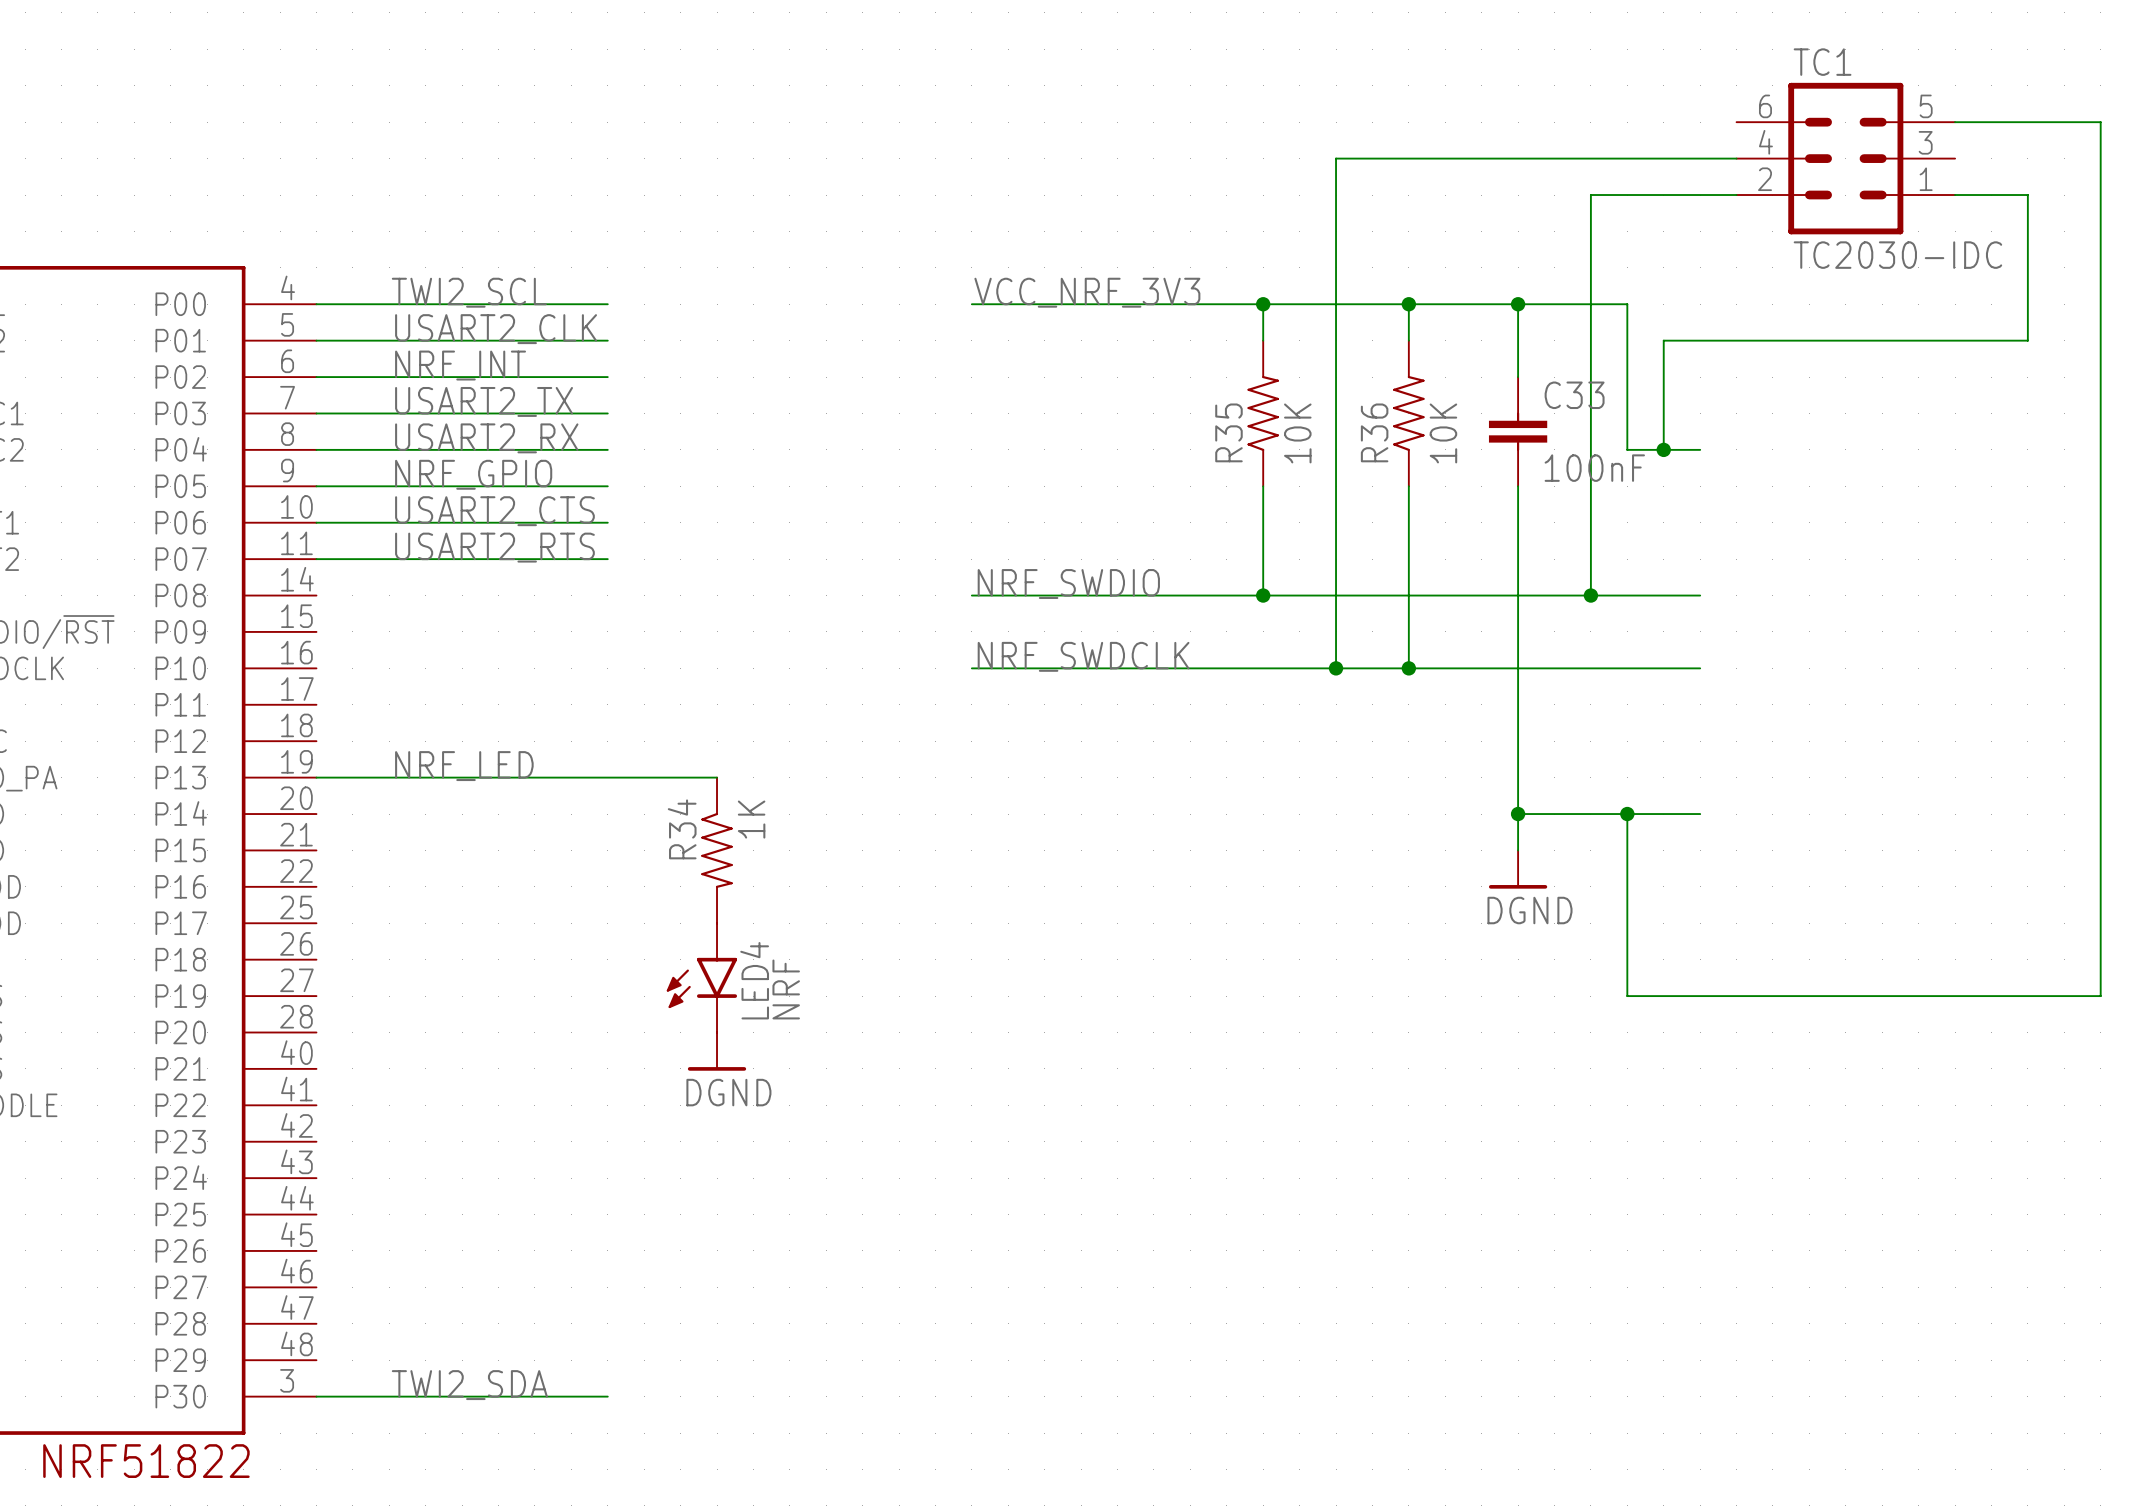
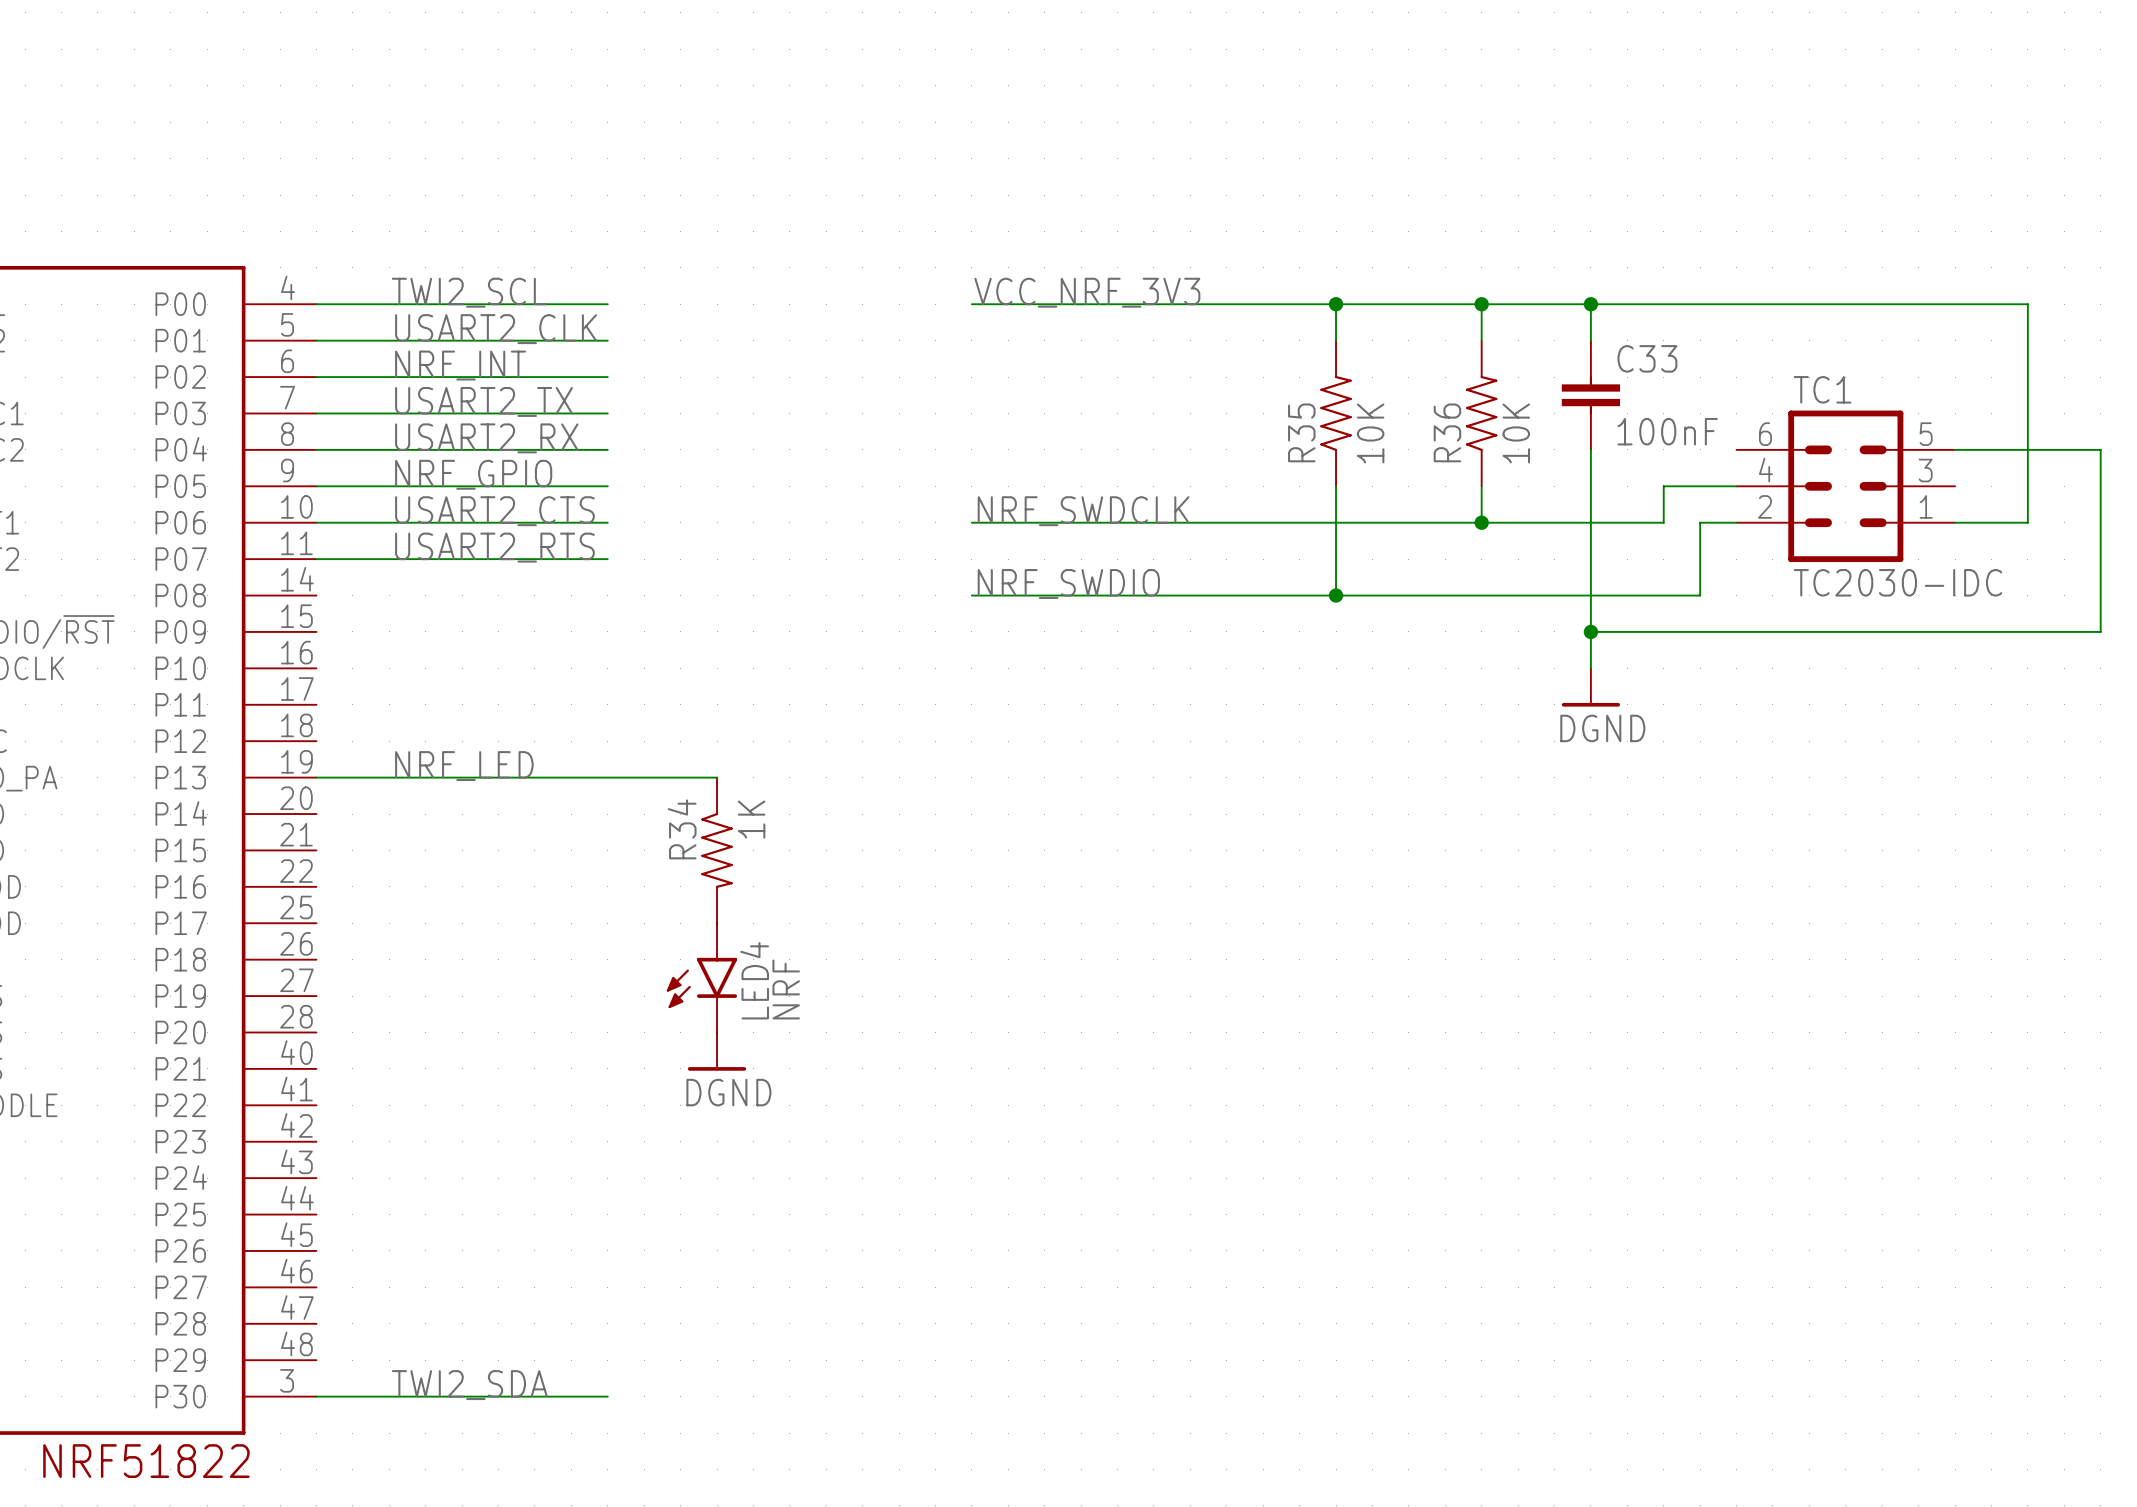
wire: (1955, 122) (2100, 122) (2100, 449) -> (1955, 449) (2100, 449)
wire: (1736, 158) (1336, 158) (1336, 304) -> none
TC1 position: (1845, 158) -> (1845, 486)
wire: (1736, 195) (1590, 195) (1590, 304) -> none
wire: (1955, 195) (2027, 195) (2027, 304) -> (1627, 304) (2027, 304)
wire: (1263, 304) (1263, 340) -> (1481, 486) (1481, 522)
junction: (1263, 304) -> none
junction: none -> (1336, 304)
wire: (1408, 304) (1408, 340) -> (1481, 304) (1481, 340)
junction: (1408, 304) -> none
junction: none -> (1481, 304)
wire: (1518, 304) (1518, 377) -> none
junction: (1518, 304) -> none
junction: none -> (1590, 304)
wire: (1627, 304) (1627, 449) (1700, 449) -> none
wire: (2027, 340) (1663, 340) (1663, 449) -> (2027, 340) (2027, 522) (1955, 522)
R35 position: (1263, 413) -> (1336, 413)
R36 position: (1408, 413) -> (1481, 413)
C33 position: (1518, 431) -> (1590, 395)
junction: (1663, 449) -> none
wire: (1263, 486) (1263, 595) -> none
wire: (1408, 486) (1408, 668) -> none
wire: (1518, 486) (1518, 850) -> none
wire: none -> (1736, 486) (1663, 486) (1663, 522) (971, 522)
junction: none -> (1481, 522)
wire: none -> (1736, 522) (1700, 522) (1700, 595)
junction: (1263, 595) -> none
wire: (1336, 595) (1336, 668) -> (1590, 595) (1590, 668)
junction: none -> (1336, 595)
junction position: (1590, 595) -> (1590, 631)
wire: (2100, 631) (2100, 996) (1627, 996) (1627, 814) -> (2100, 631) (1590, 631)
label position: NRF_SWDCLK (1083, 656) -> NRF_SWDCLK (1083, 511)
wire: (971, 668) (1700, 668) -> none
junction: (1336, 668) -> none
junction: (1408, 668) -> none
wire: (1518, 814) (1700, 814) -> none
junction: (1518, 814) -> none
junction: (1627, 814) -> none
power symbol position: DGND (1518, 869) -> DGND (1590, 687)

